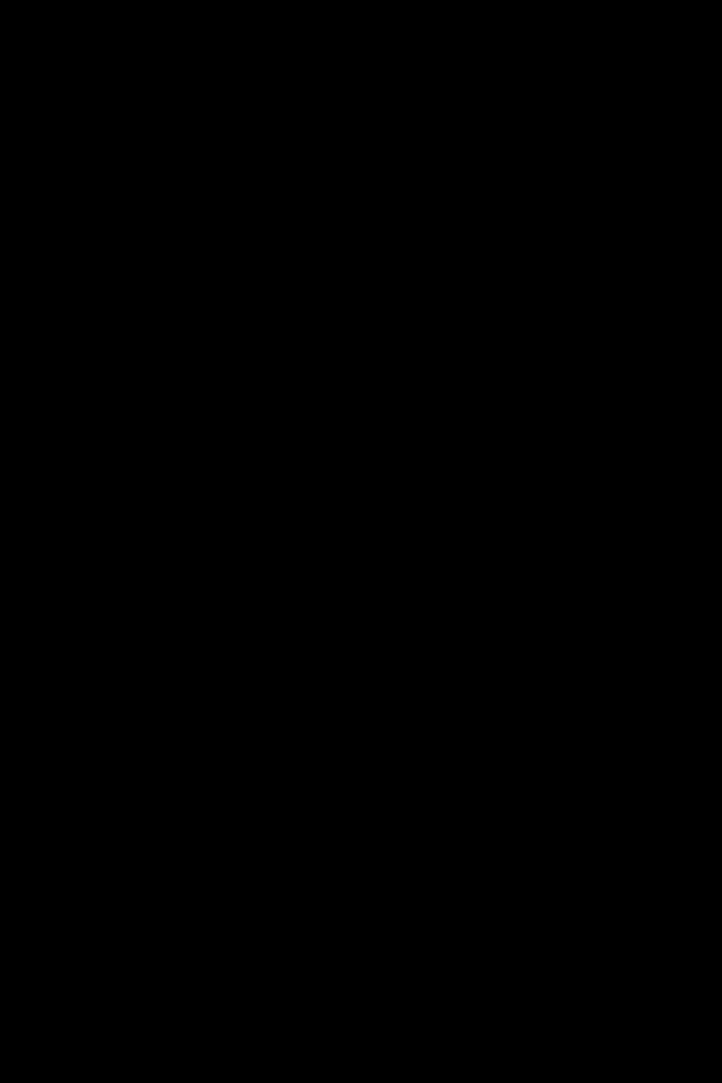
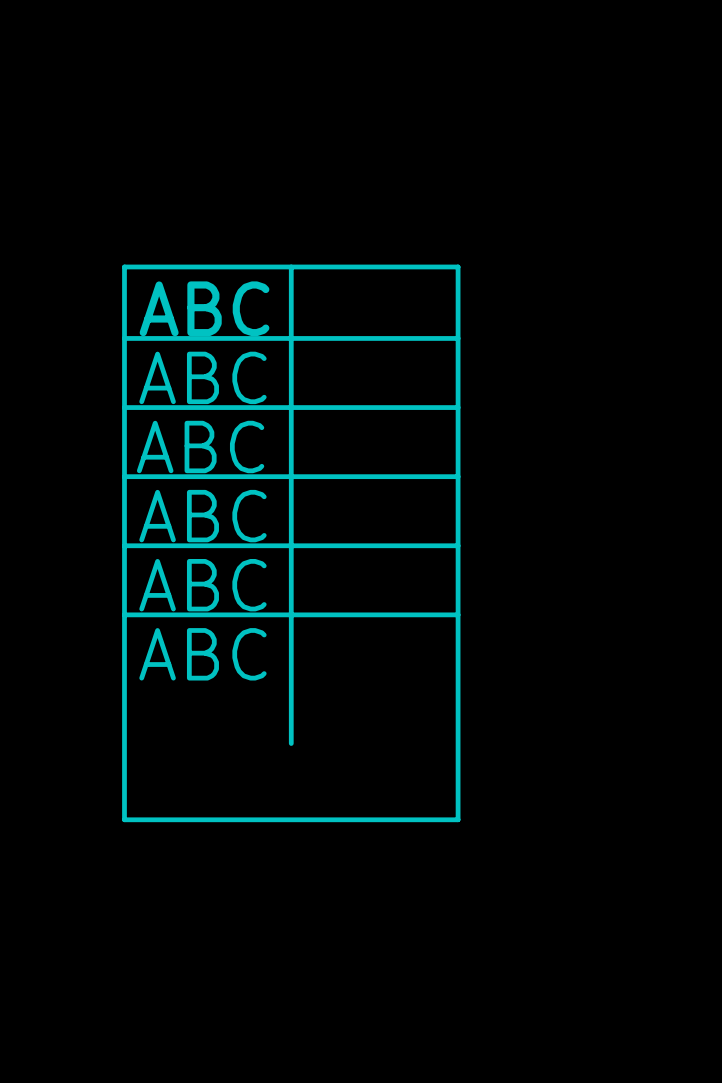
line: none -> (291, 266) (291, 743)
line: none -> (458, 266) (124, 266) (124, 819) (458, 819) (458, 266)
text: none -> ABC (204, 308)
line: none -> (458, 338) (124, 338)
text: none -> ABC (202, 377)
line: none -> (458, 407) (124, 407)
text: none -> ABC (200, 447)
line: none -> (458, 476) (124, 476)
text: none -> ABC (202, 516)
line: none -> (458, 545) (124, 545)
text: none -> ABC (202, 585)
line: none -> (458, 614) (124, 614)
text: none -> ABC (202, 654)

